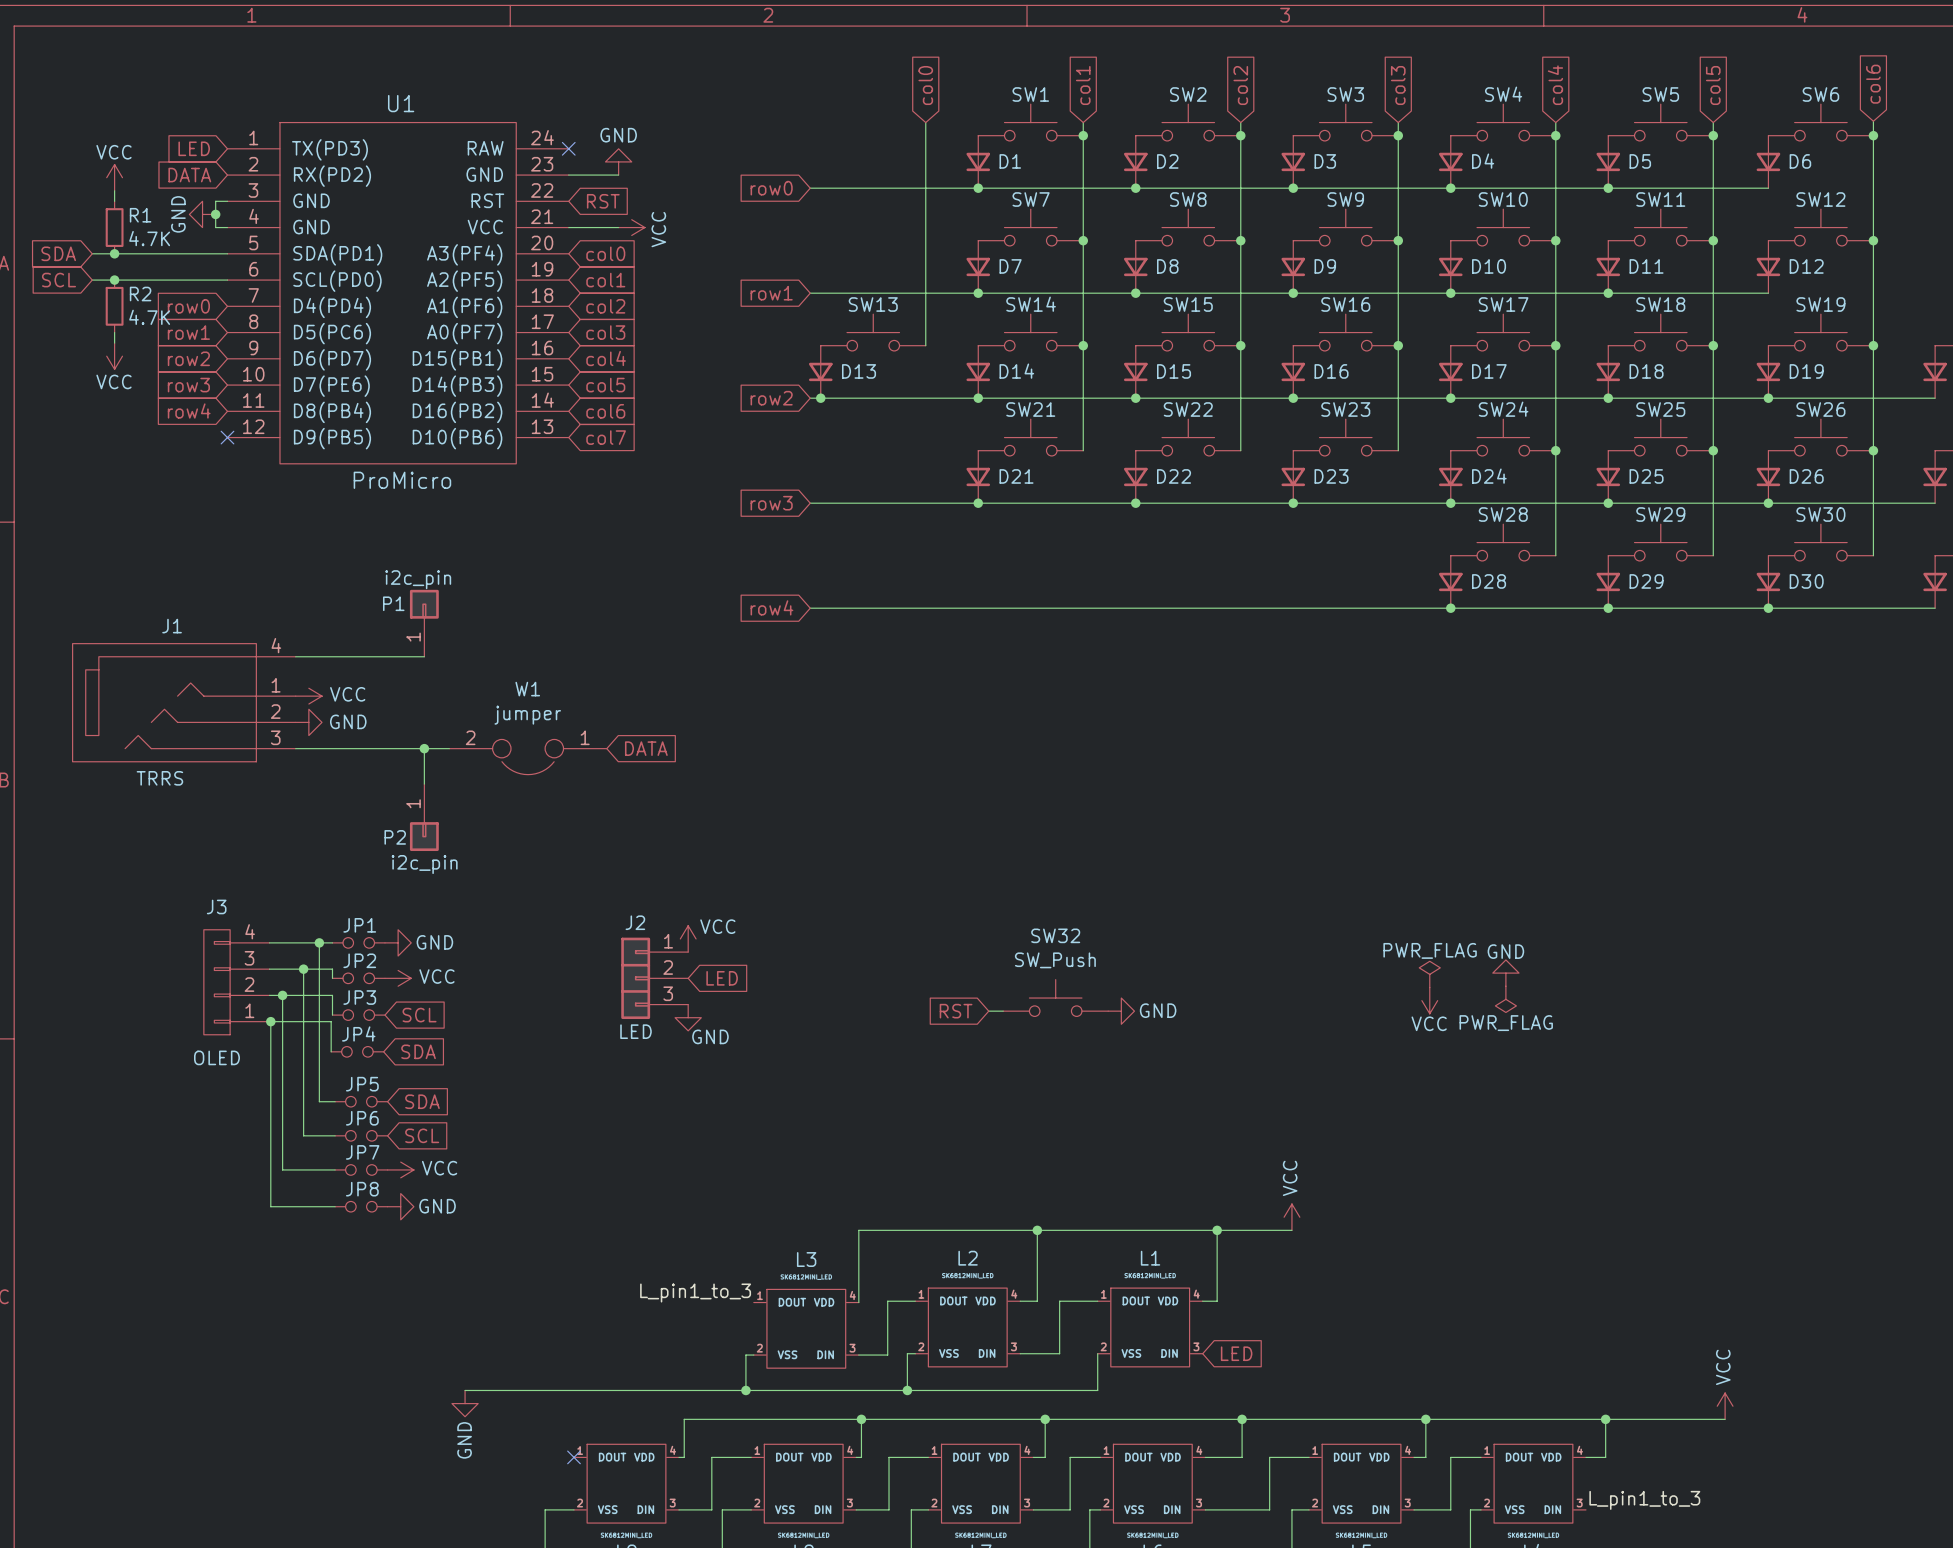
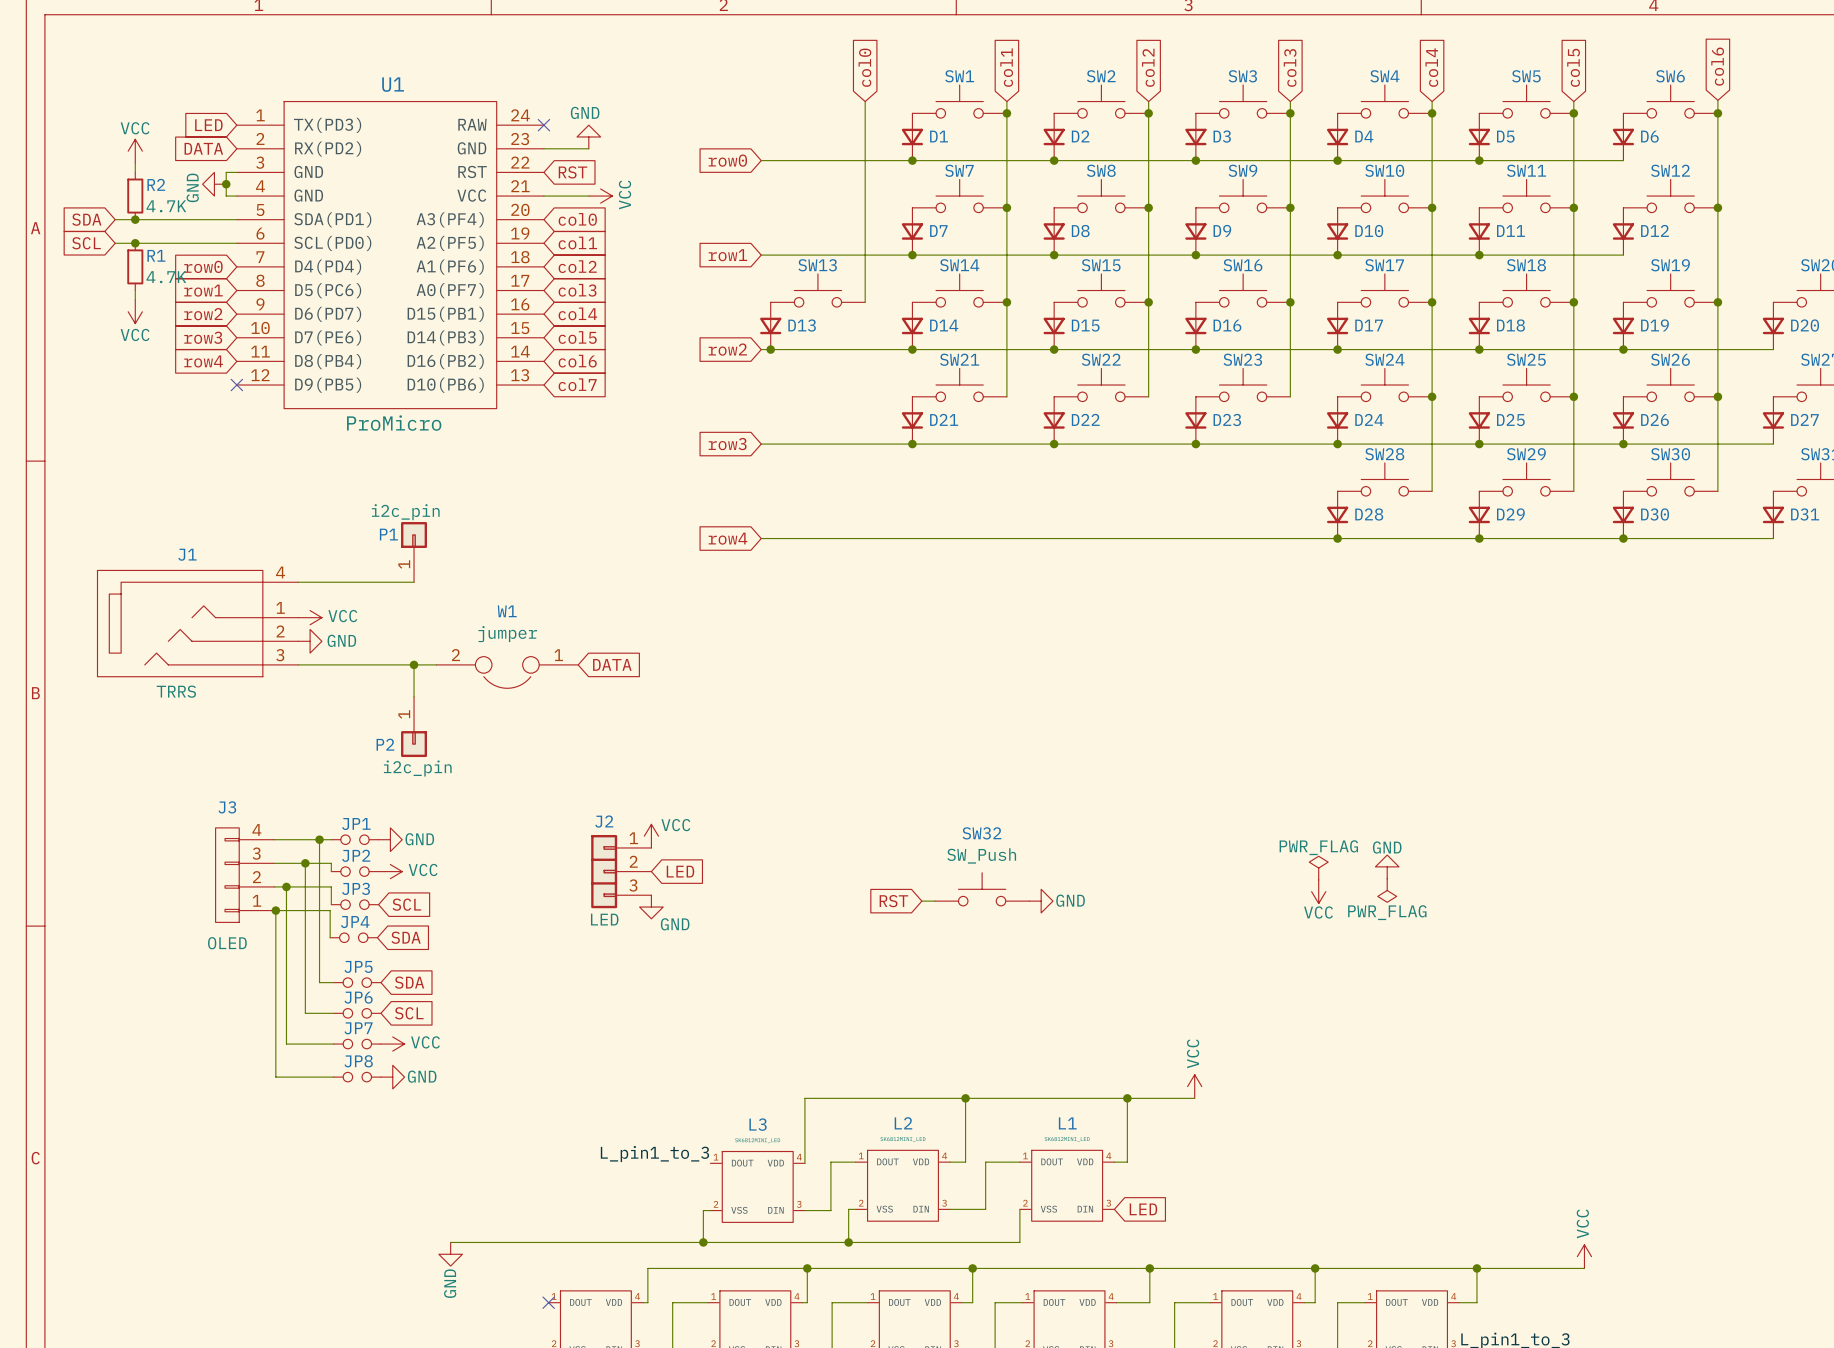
R1 name: R1 (140, 215) -> R2 (156, 184)
R2 name: R2 (140, 294) -> R1 (156, 255)

